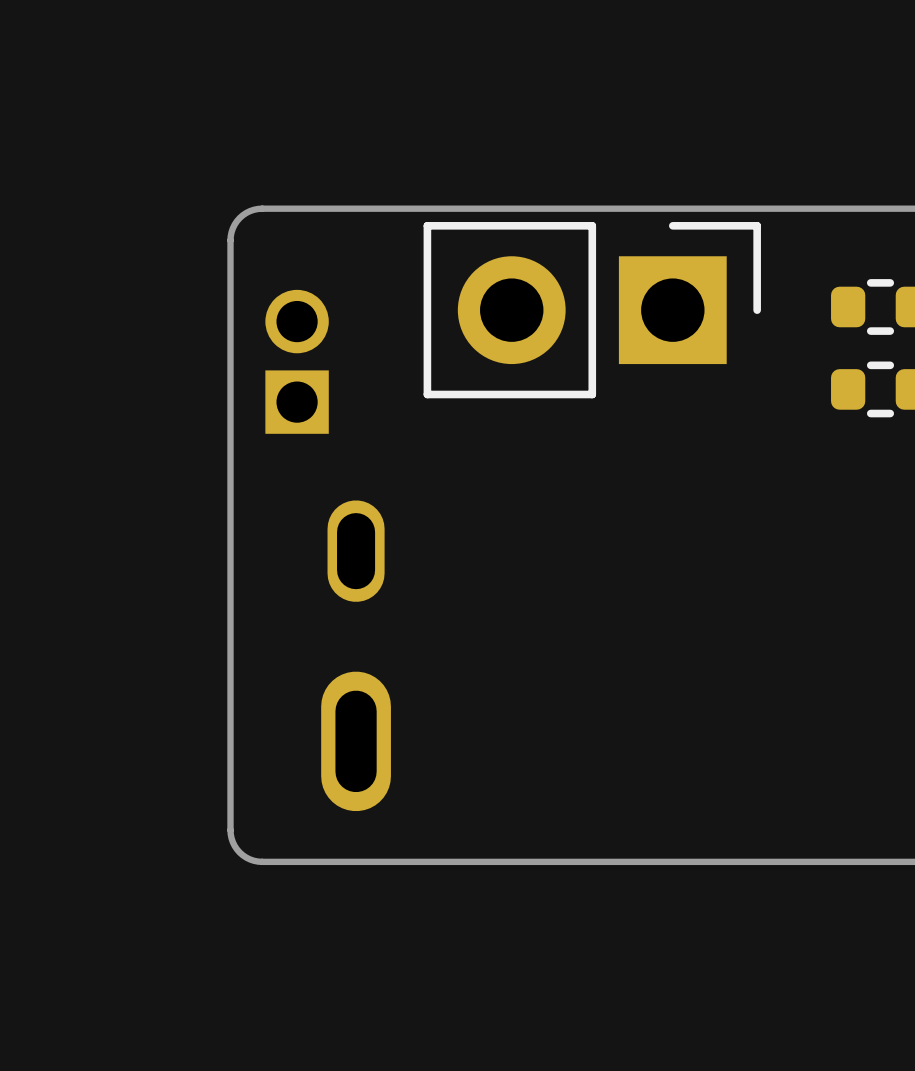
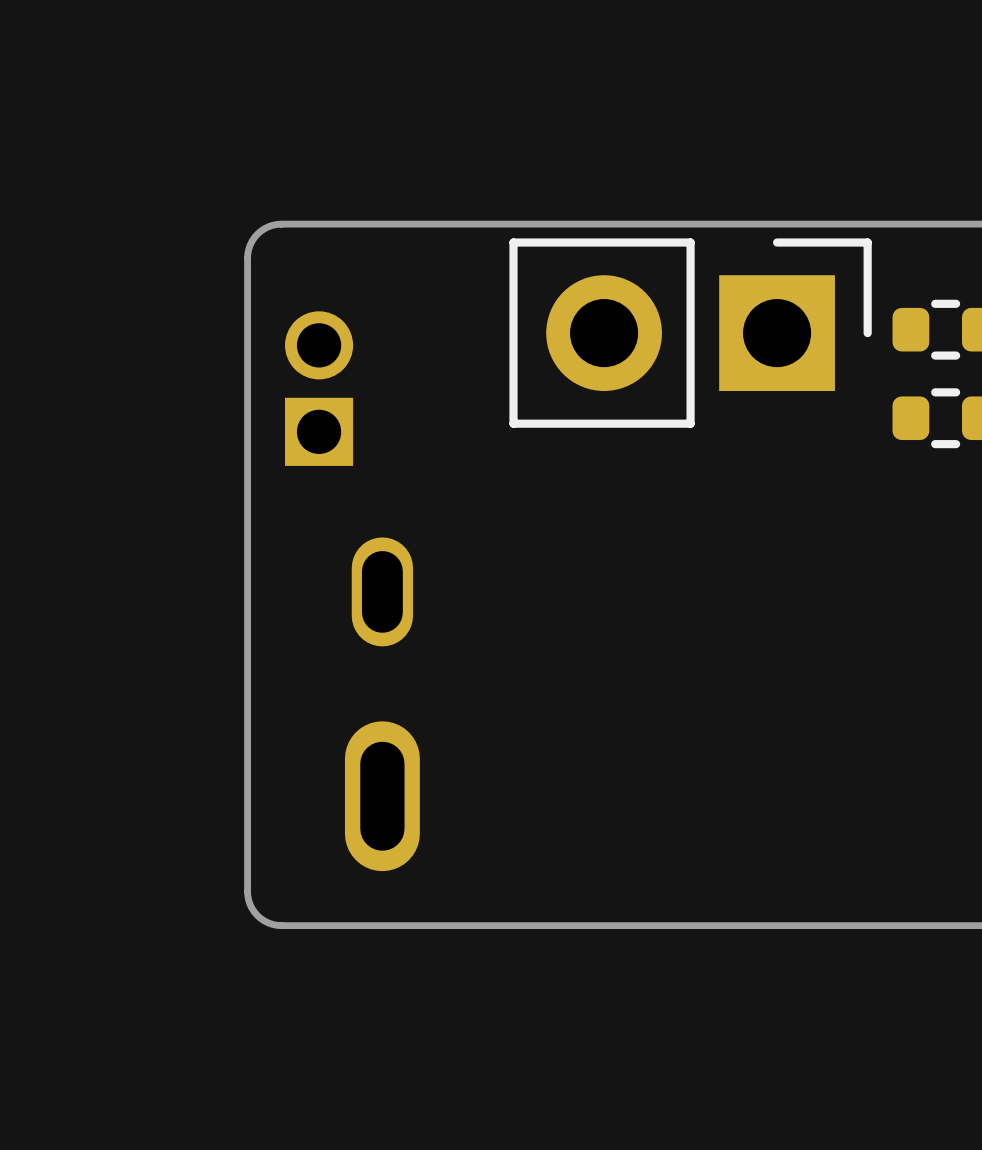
part position: (592, 310) -> (690, 333)

